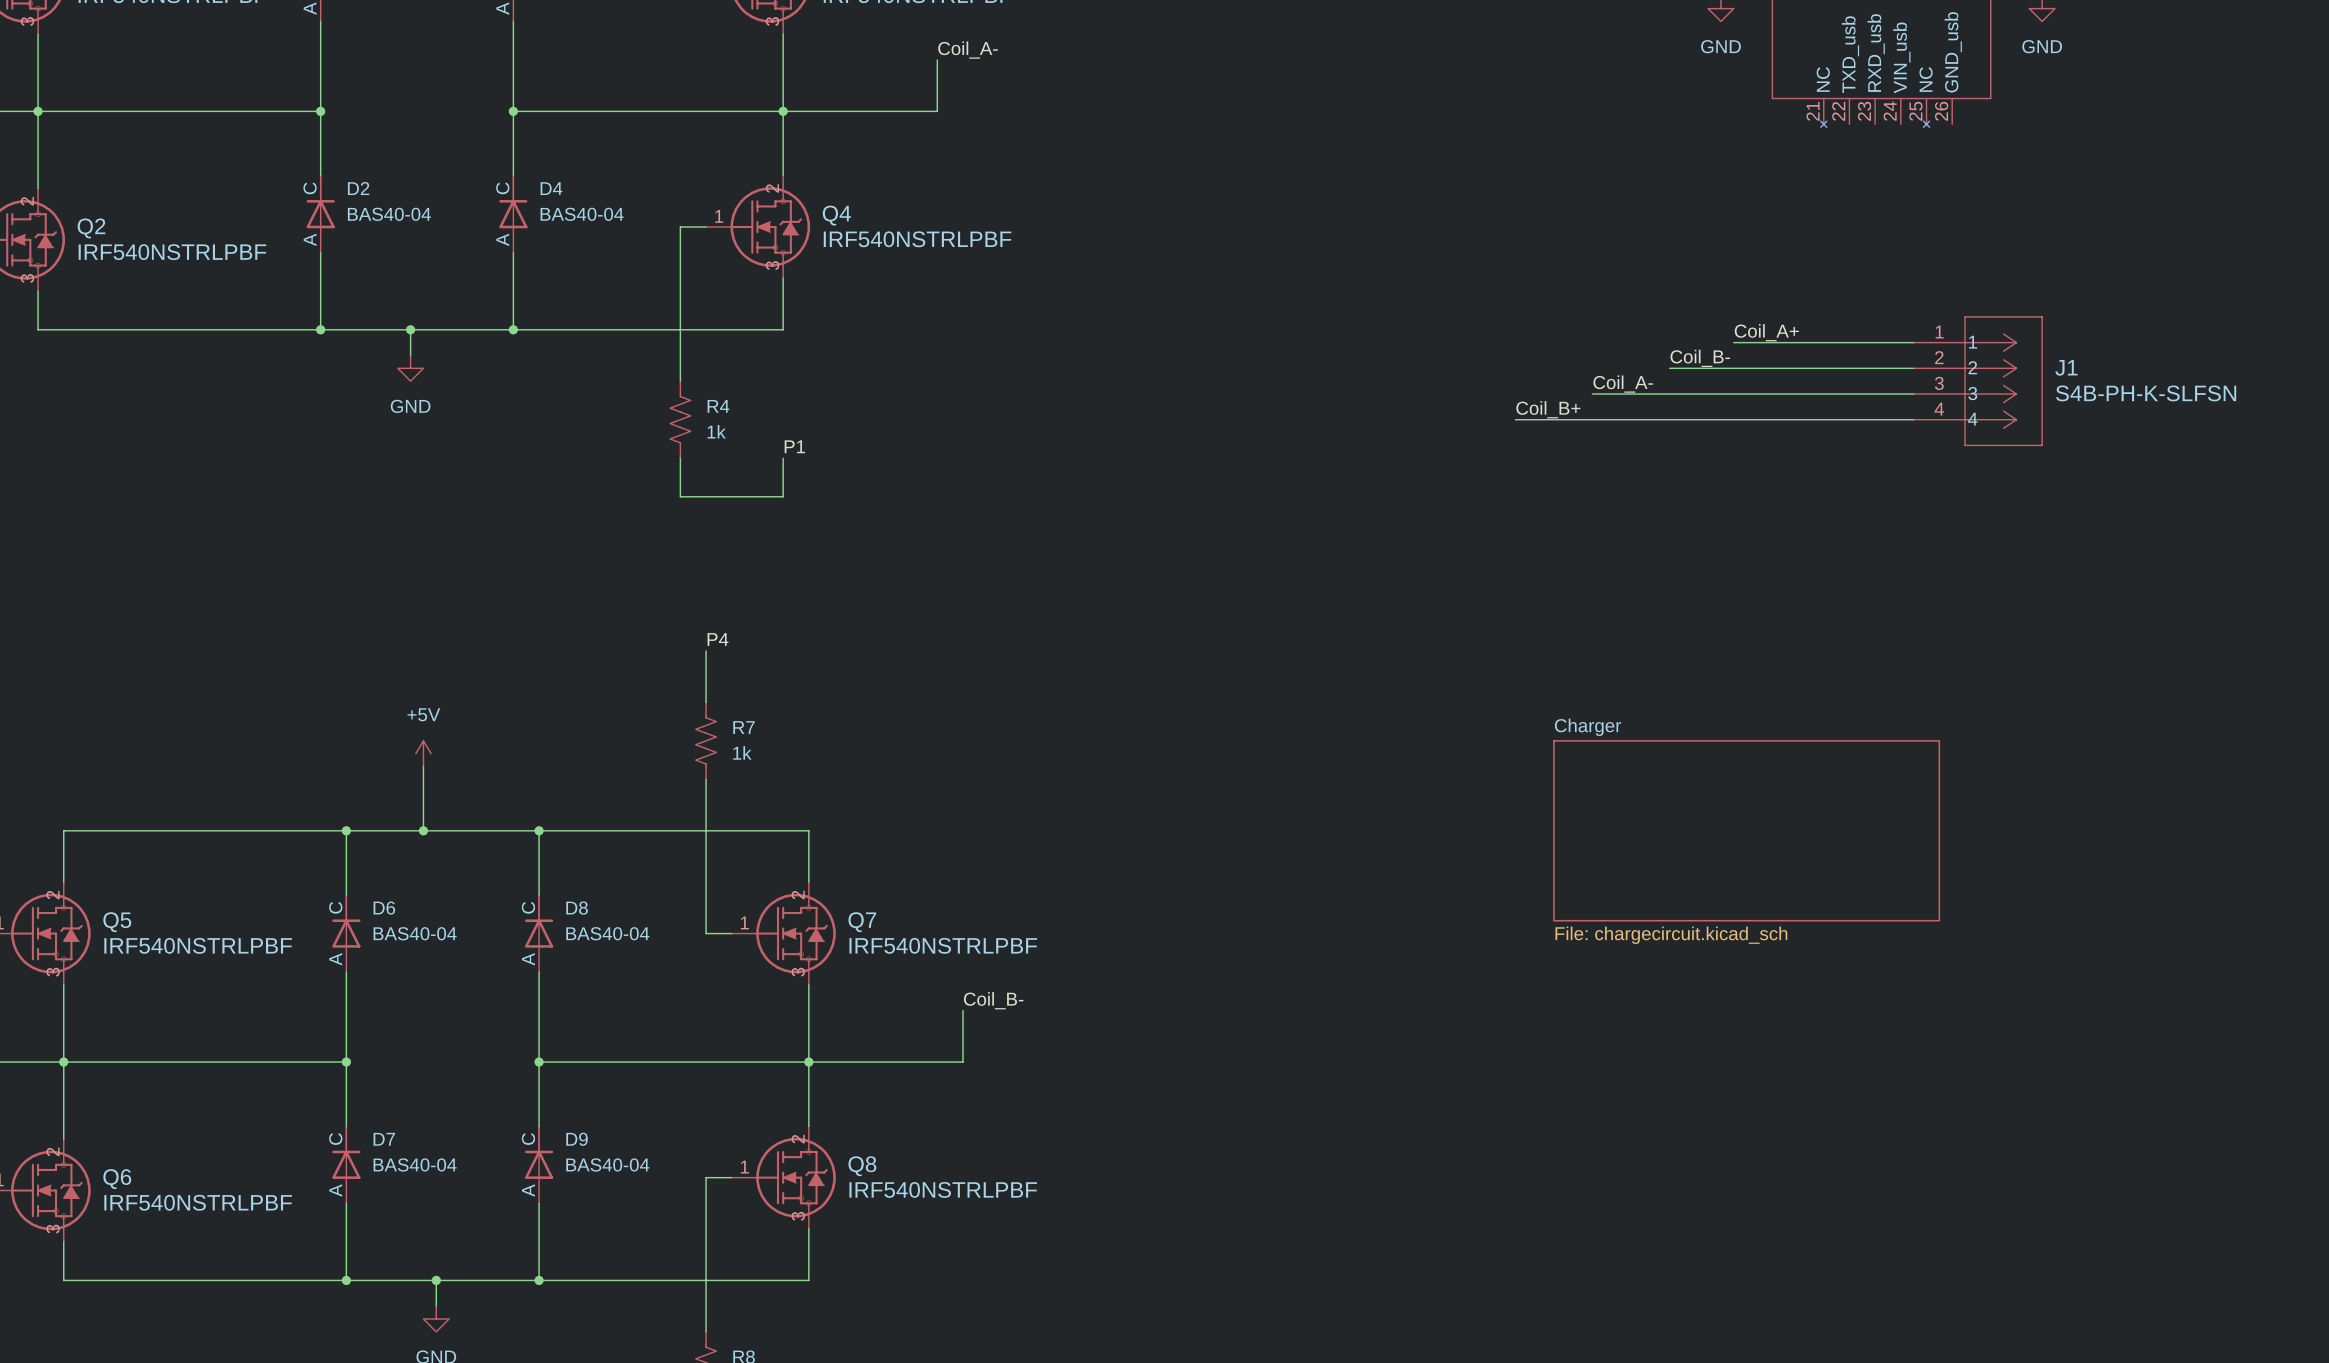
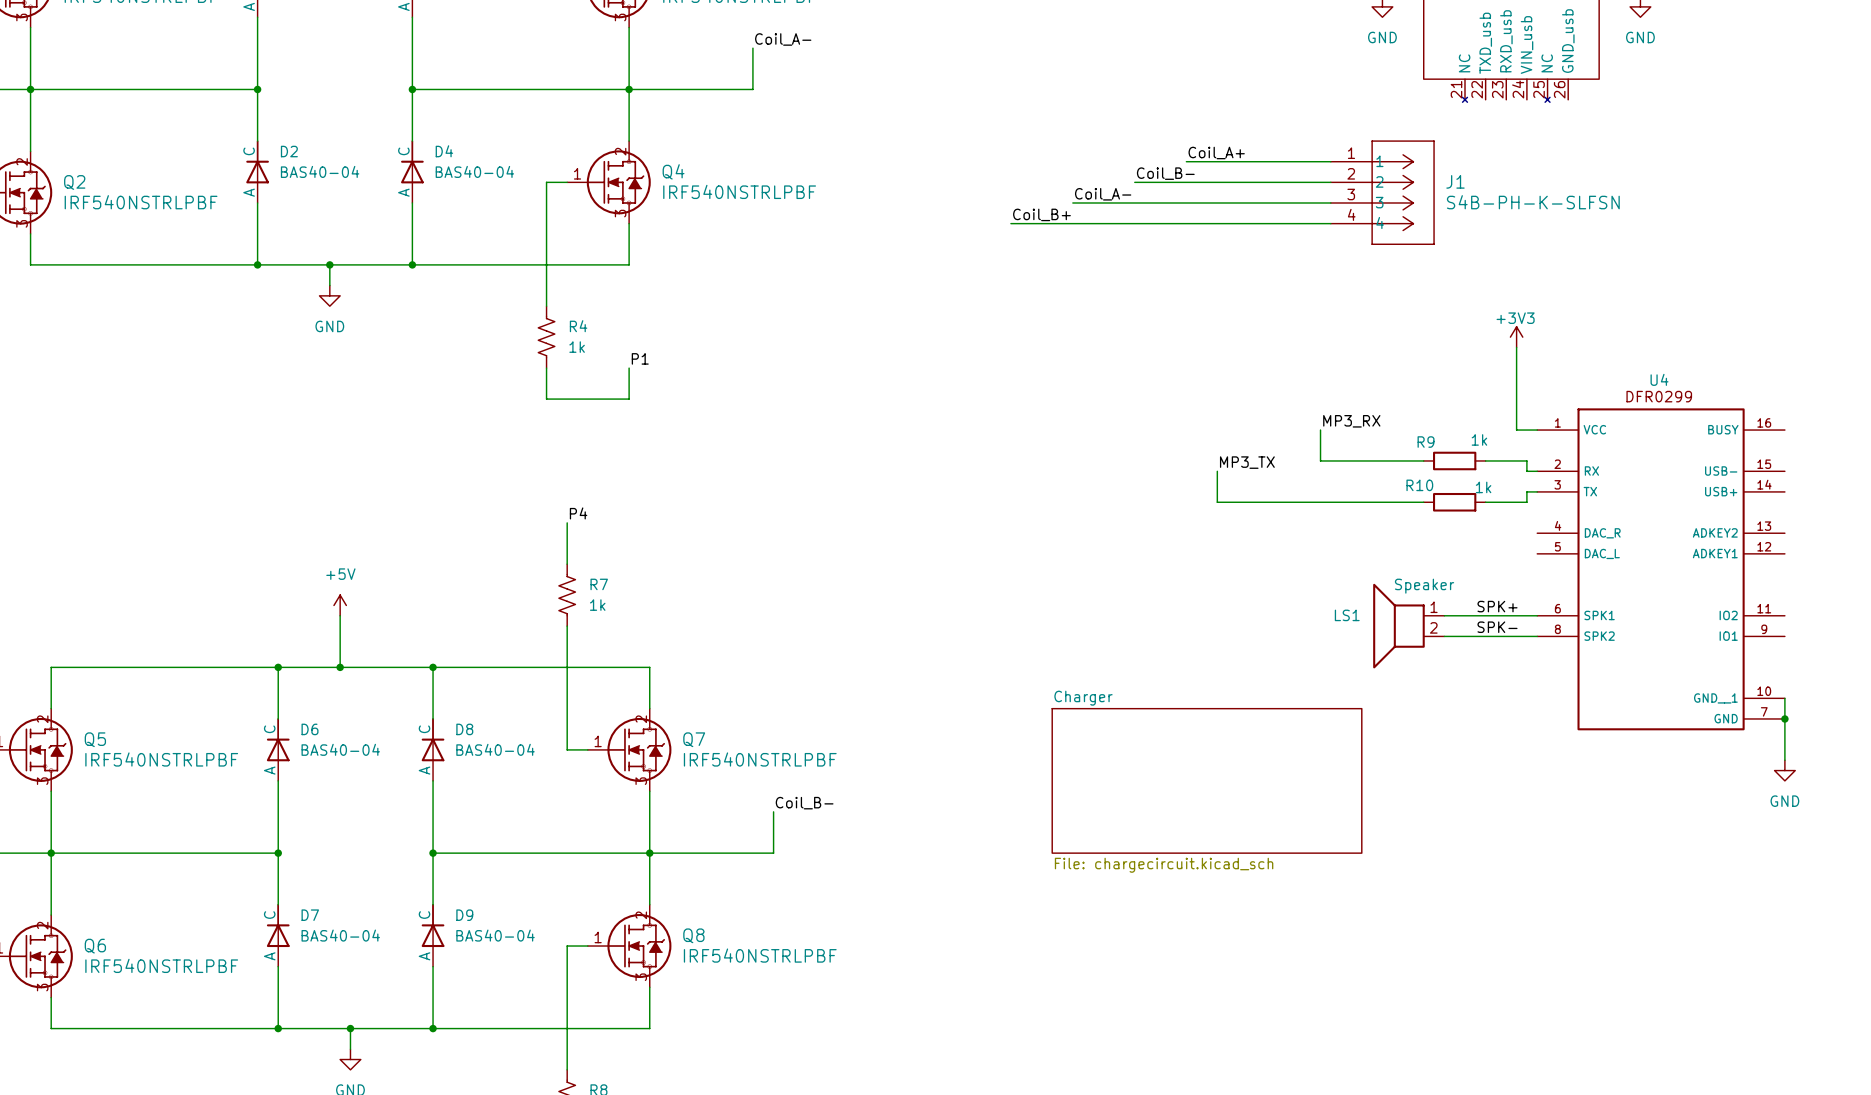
label: none -> Coil_A+ (1216, 152)
wire: none -> (1186, 161) (1330, 161)
label: none -> Coil_B- (1165, 173)
wire: none -> (1134, 182) (1330, 182)
label: none -> Coil_A- (1103, 194)
wire: none -> (1072, 202) (1330, 202)
label: none -> Coil_B+ (1041, 214)
wire: none -> (1010, 223) (1330, 223)
label: Coil_A+ (1766, 332) -> none
wire: (1733, 342) (1913, 342) -> none
label: Coil_B- (1700, 358) -> none
wire: (1669, 368) (1913, 368) -> none
J1 position: (1978, 381) -> (1382, 192)
label: Coil_A- (1623, 384) -> none
wire: (1592, 394) (1913, 394) -> none
label: Coil_B+ (1548, 409) -> none
wire: (1515, 419) (1913, 419) -> none
power symbol: none -> +3V3 (1516, 337)
wire: none -> (1516, 347) (1516, 430) (1537, 430)
label: none -> MP3_RX (1351, 421)
wire: none -> (1320, 430) (1320, 460) (1423, 460)
R9: none -> 1k (1454, 460)
wire: none -> (1485, 460) (1526, 460) (1526, 471) (1537, 471)
label: none -> MP3_TX (1247, 462)
wire: none -> (1217, 471) (1217, 502) (1423, 502)
wire: none -> (1537, 491) (1526, 491) (1526, 502) (1485, 502)
R10: none -> 1k (1454, 502)
U4: none -> (1661, 569)
label: none -> SPK+ (1497, 606)
wire: none -> (1444, 615) (1537, 615)
LS1: none -> Speaker (1408, 626)
label: none -> SPK- (1497, 627)
wire: none -> (1444, 636) (1537, 636)
sheet Charger: File: chargecircuit.kicad_sch (1746, 830) -> none
wire: none -> (1784, 698) (1784, 760)
junction: none -> (1784, 718)
power symbol: none -> GND (1784, 770)
sheet Charger: none -> File: chargecircuit.kicad_sch (1207, 780)

